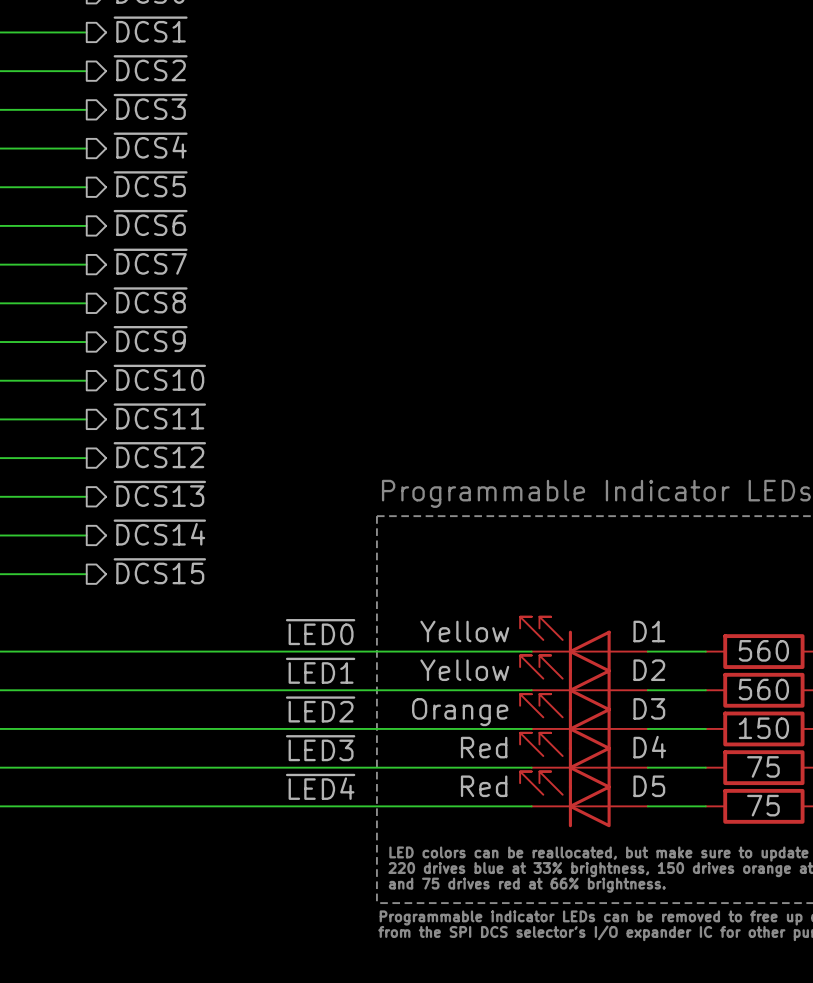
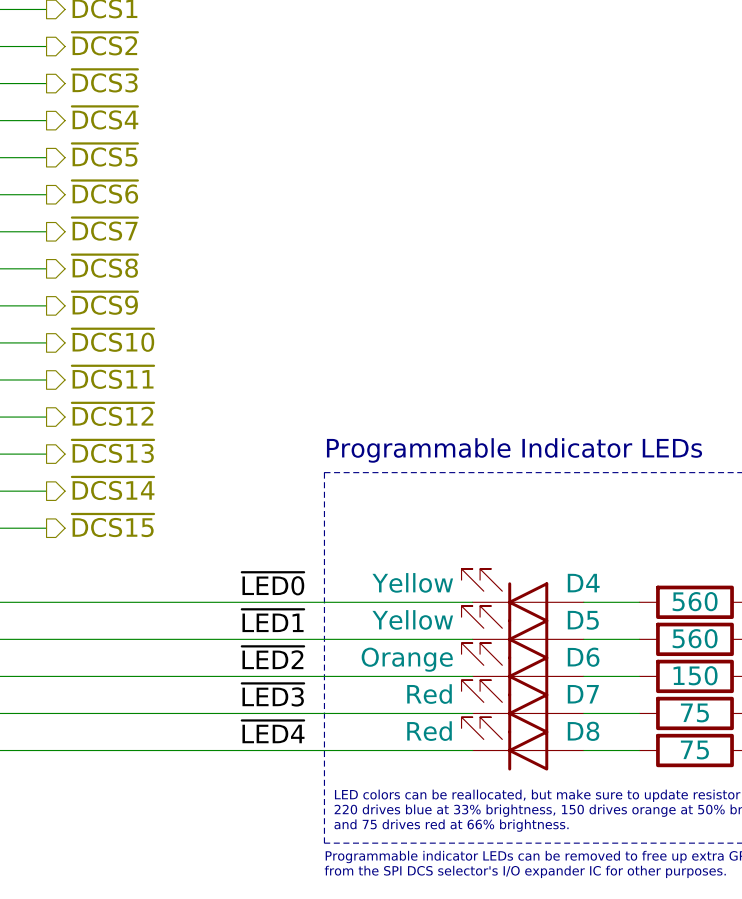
D1 name: D1 (649, 631) -> D4 (583, 583)
D2 name: D2 (649, 670) -> D5 (583, 620)
D3 name: D3 (649, 708) -> D6 (583, 657)
D4 name: D4 (649, 747) -> D7 (583, 694)
D5 name: D5 (649, 786) -> D8 (583, 731)

